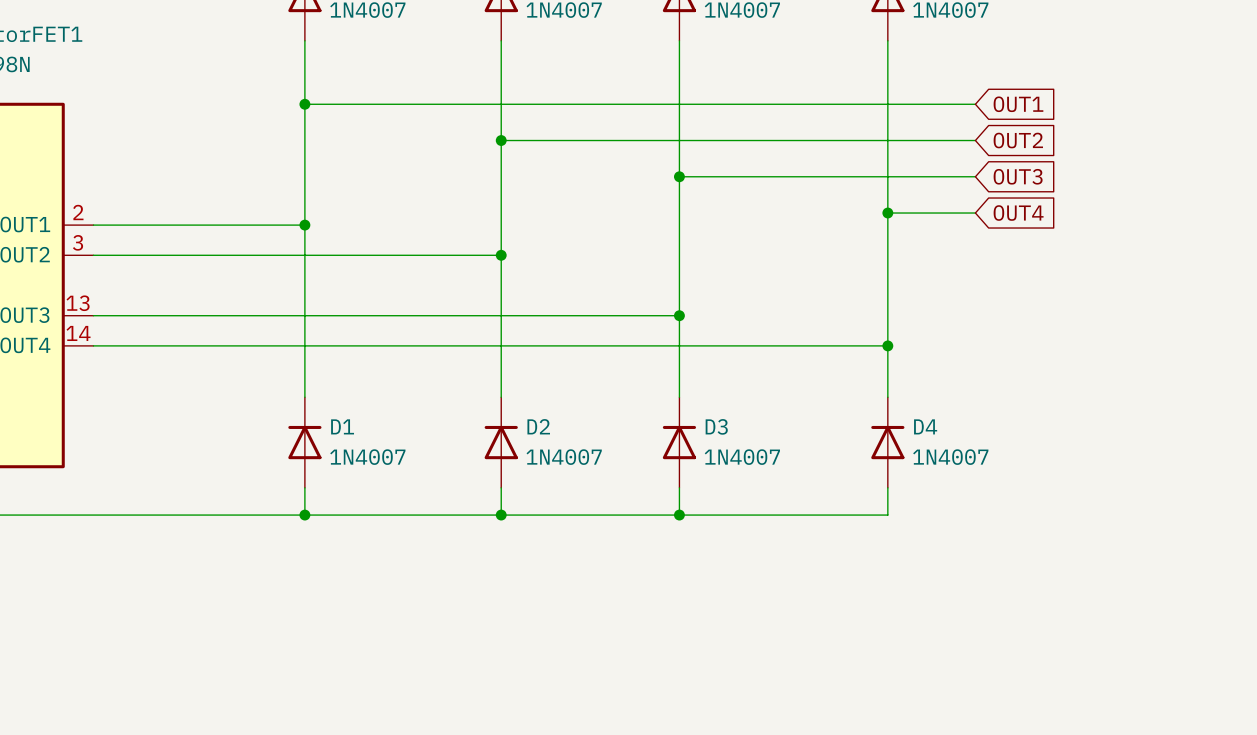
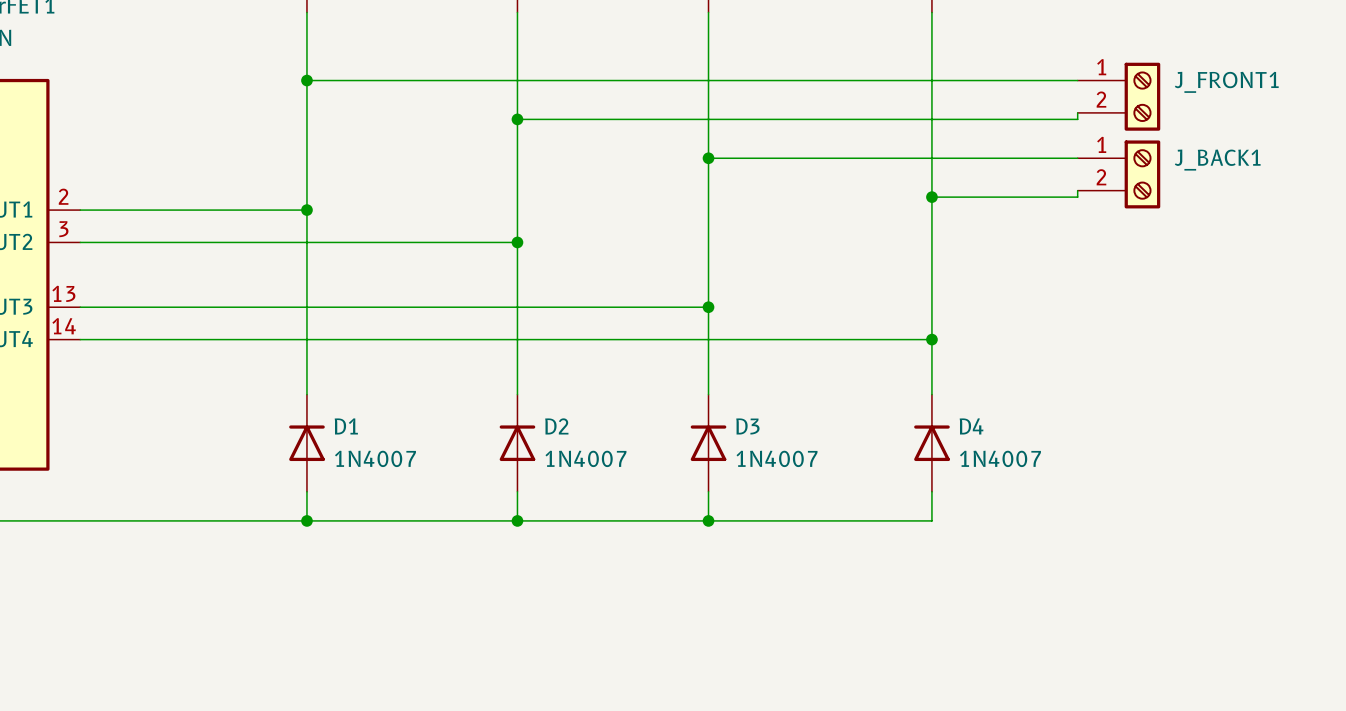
wire: none -> (1025, 80) (1077, 80)
global label: OUT1 (1018, 104) -> none
J_FRONT1: none -> (1118, 96)
wire: none -> (1077, 112) (1077, 119) (1025, 119)
global label: OUT2 (1018, 140) -> none
wire: none -> (1025, 158) (1077, 158)
global label: OUT3 (1018, 176) -> none
J_BACK1: none -> (1118, 174)
wire: none -> (1077, 190) (1077, 197) (1025, 197)
global label: OUT4 (1018, 213) -> none

